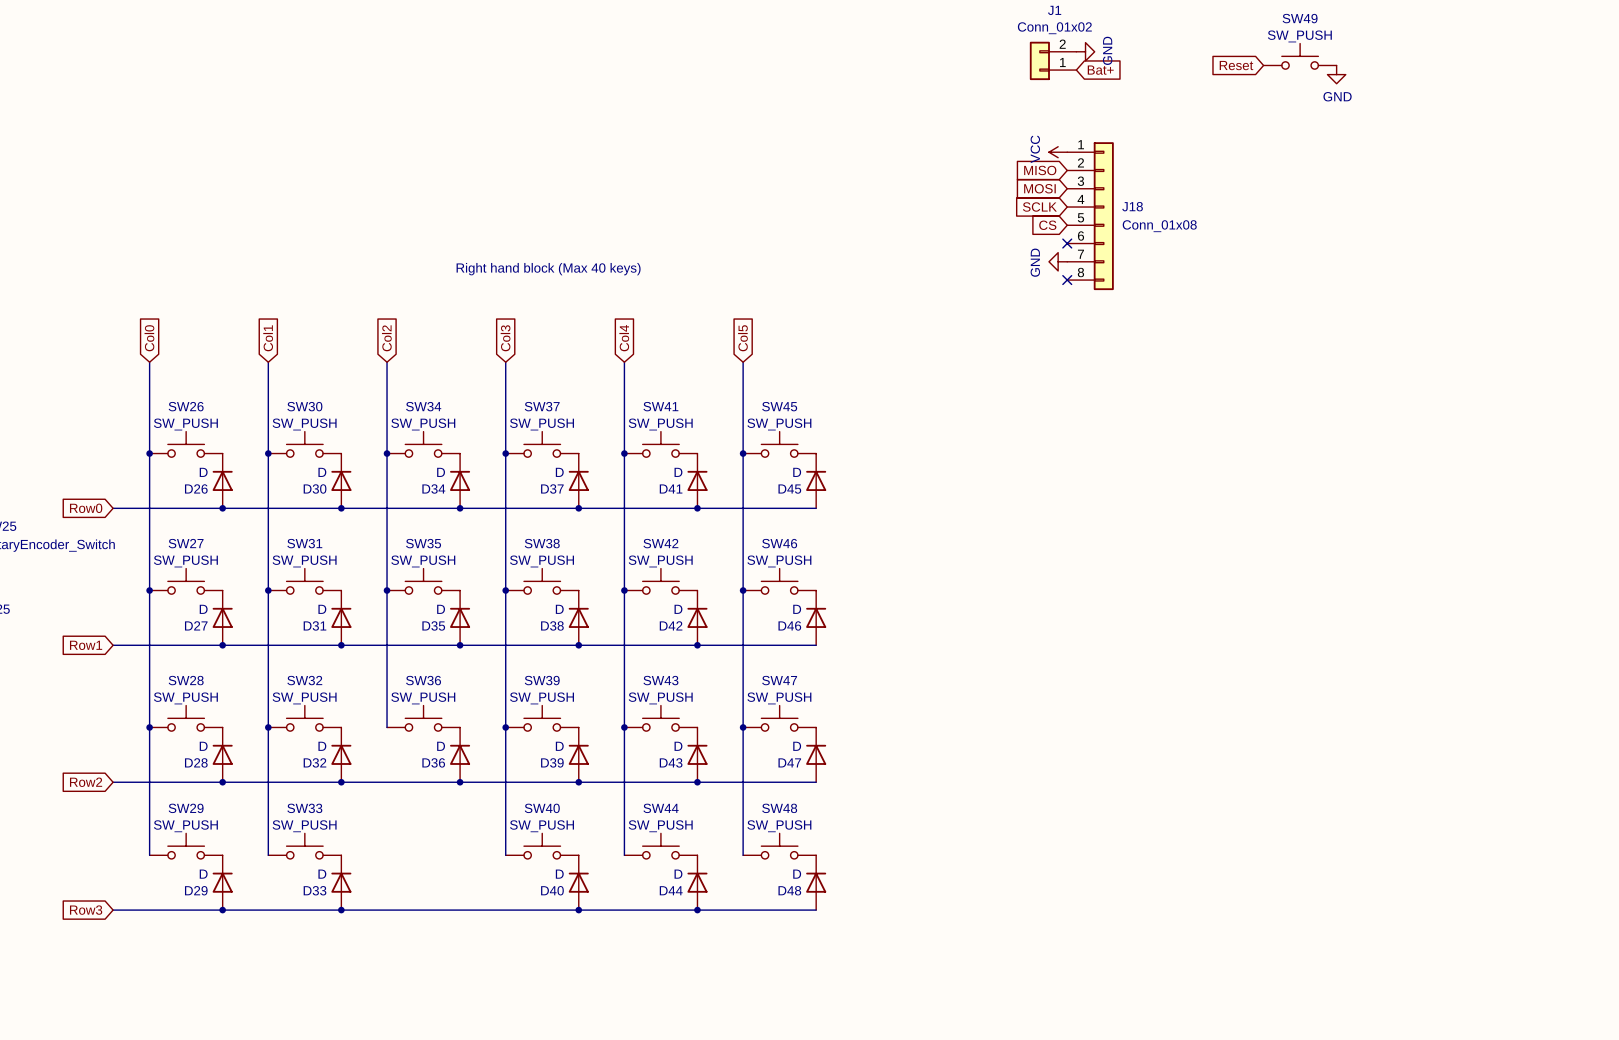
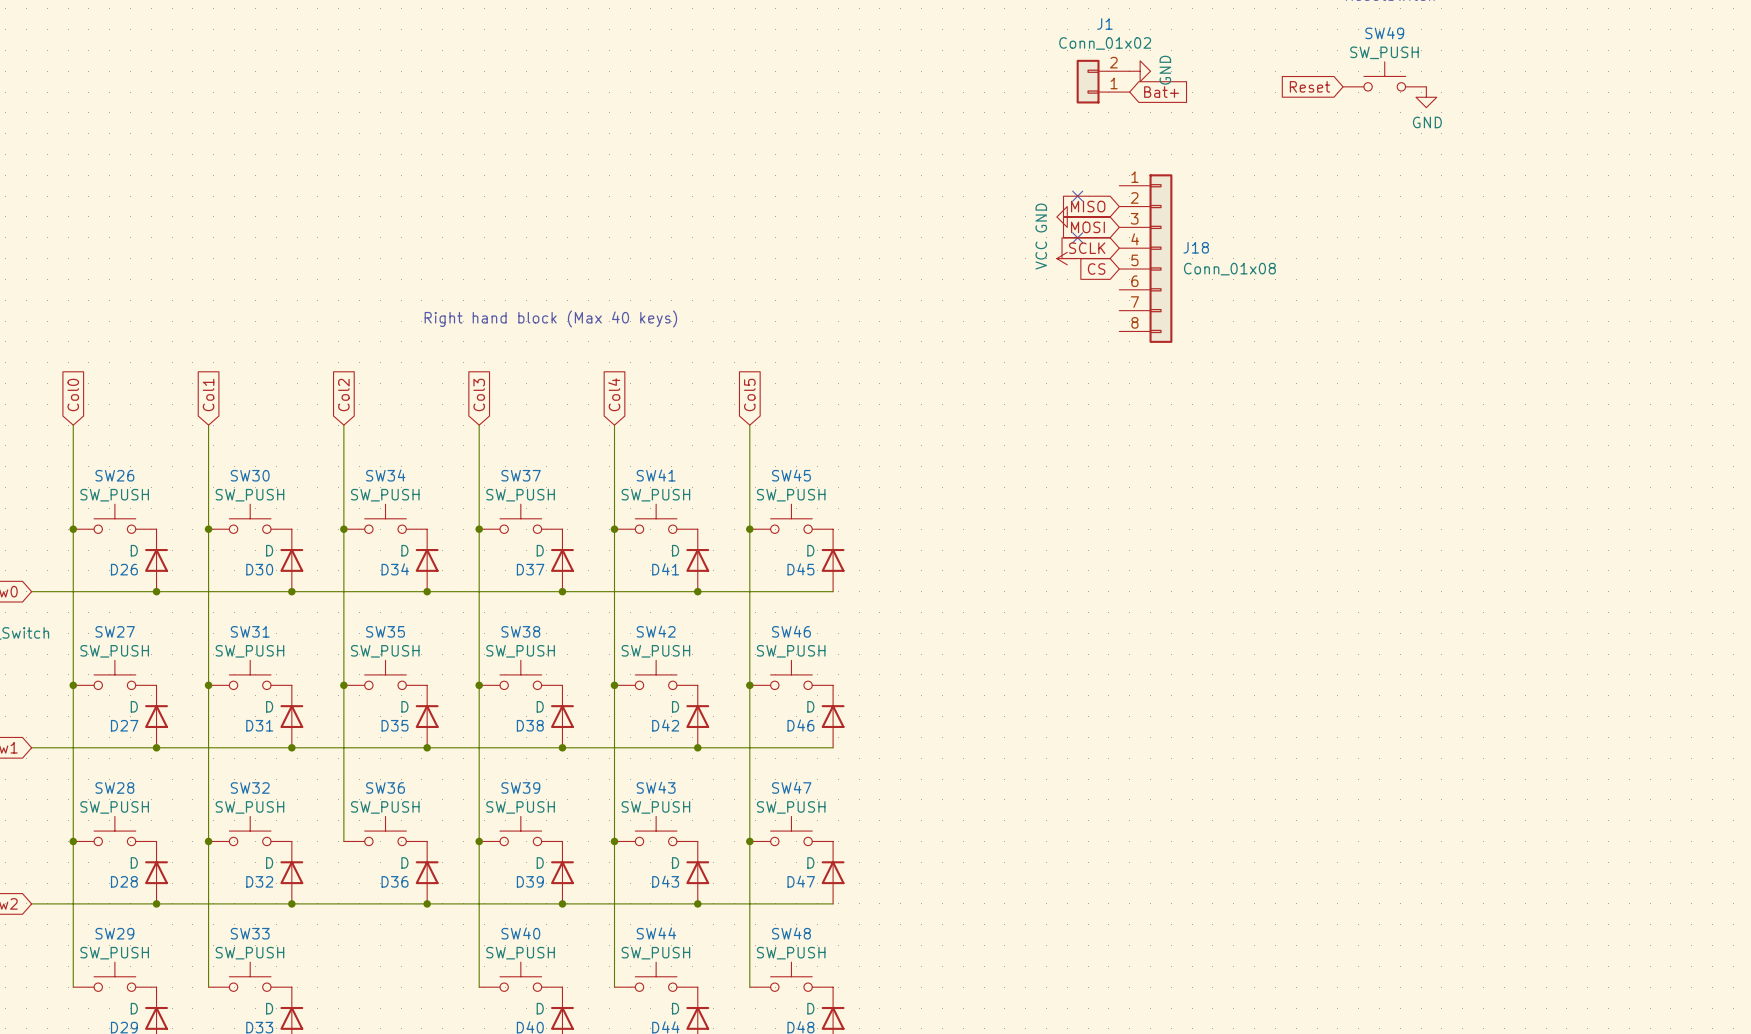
power symbol position: VCC (1058, 152) -> VCC (1067, 258)
no-connect mark: none -> (1077, 196)
no-connect mark: none -> (1077, 237)
no-connect mark: (1067, 243) -> none
power symbol position: GND (1058, 261) -> GND (1067, 216)
no-connect mark: (1067, 280) -> none

